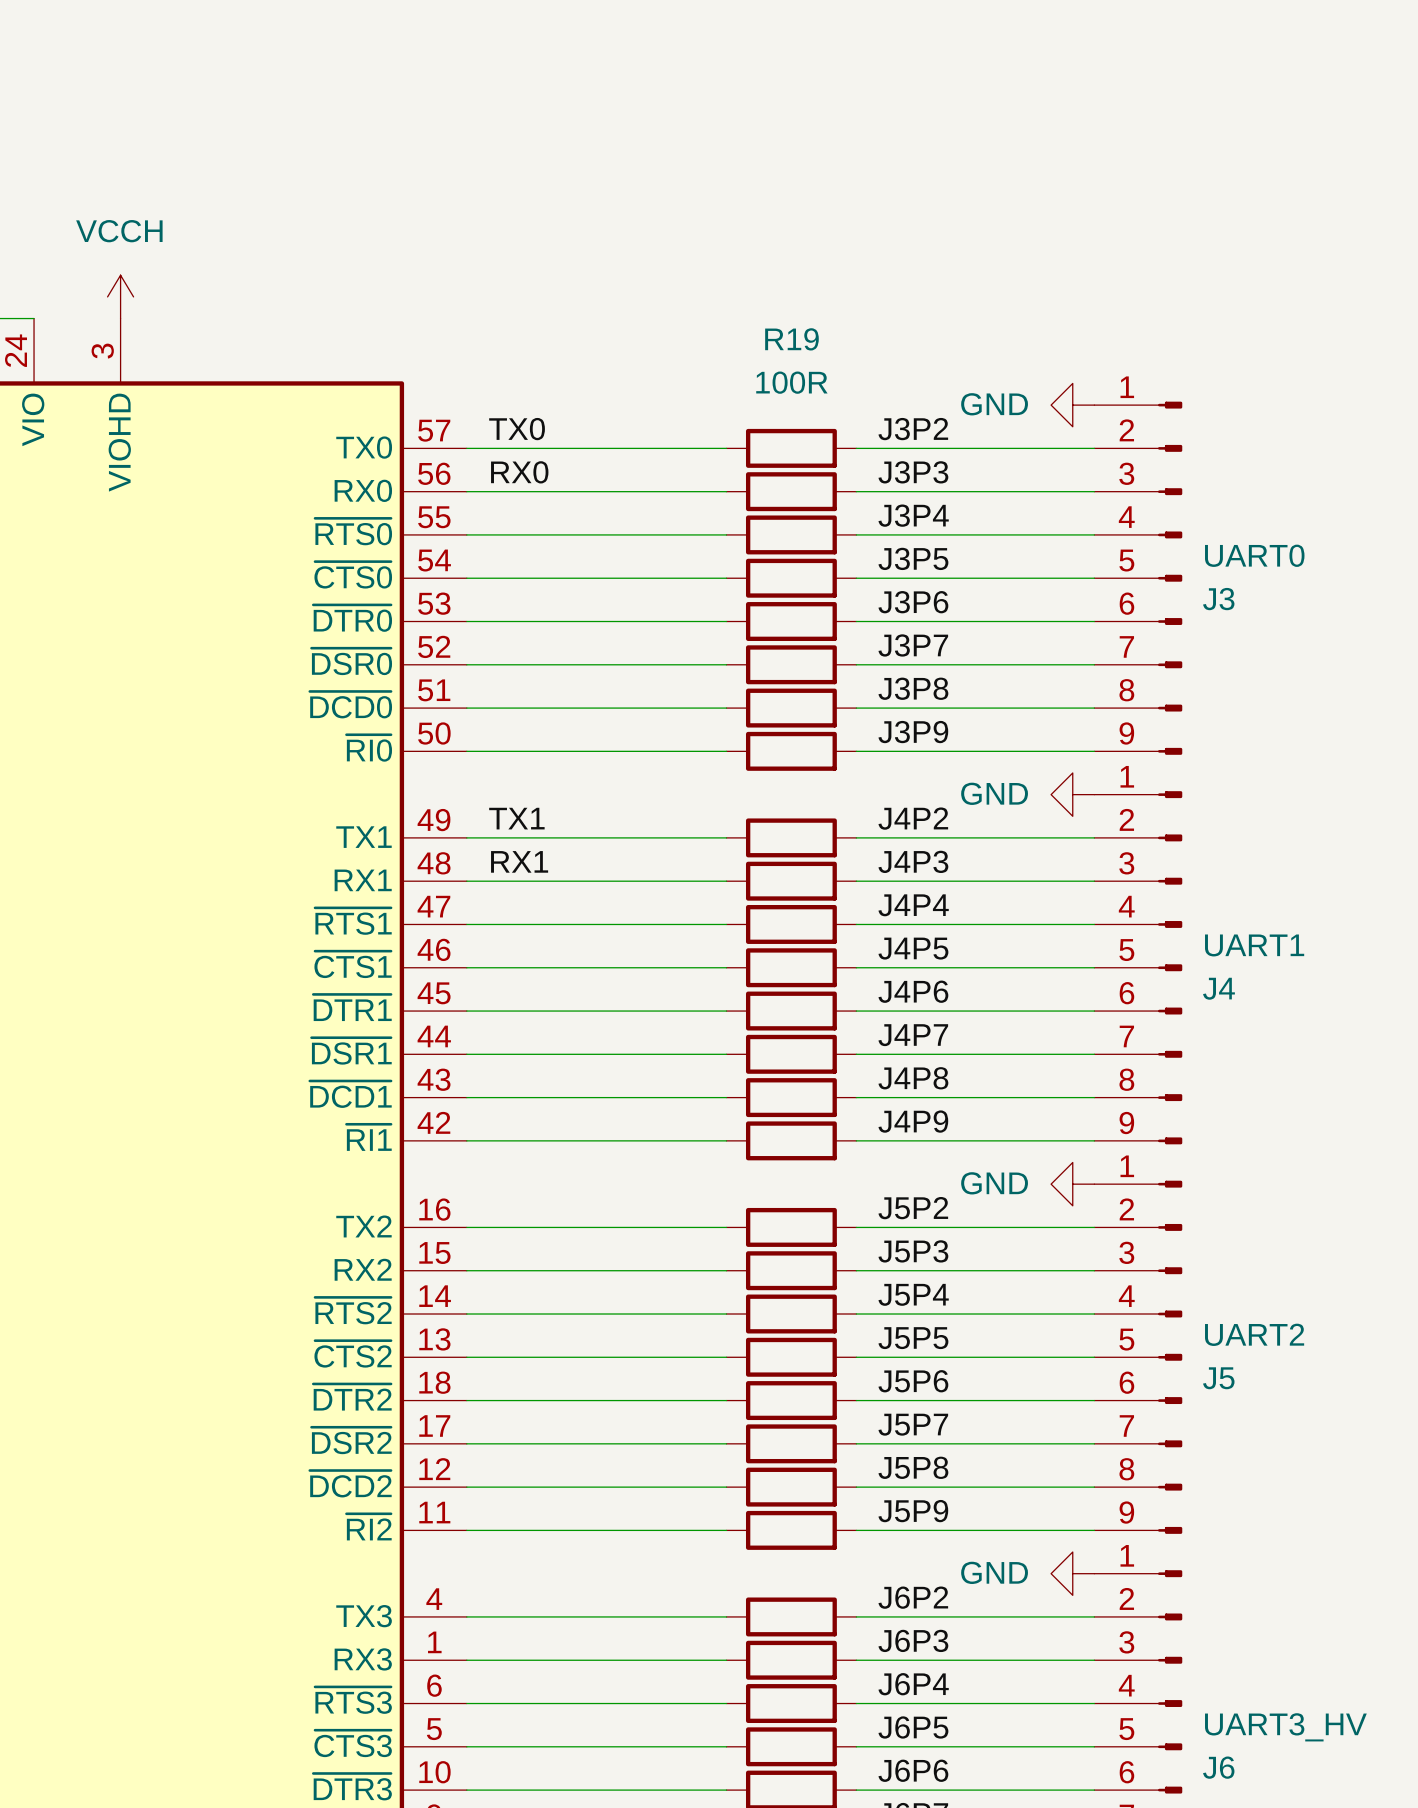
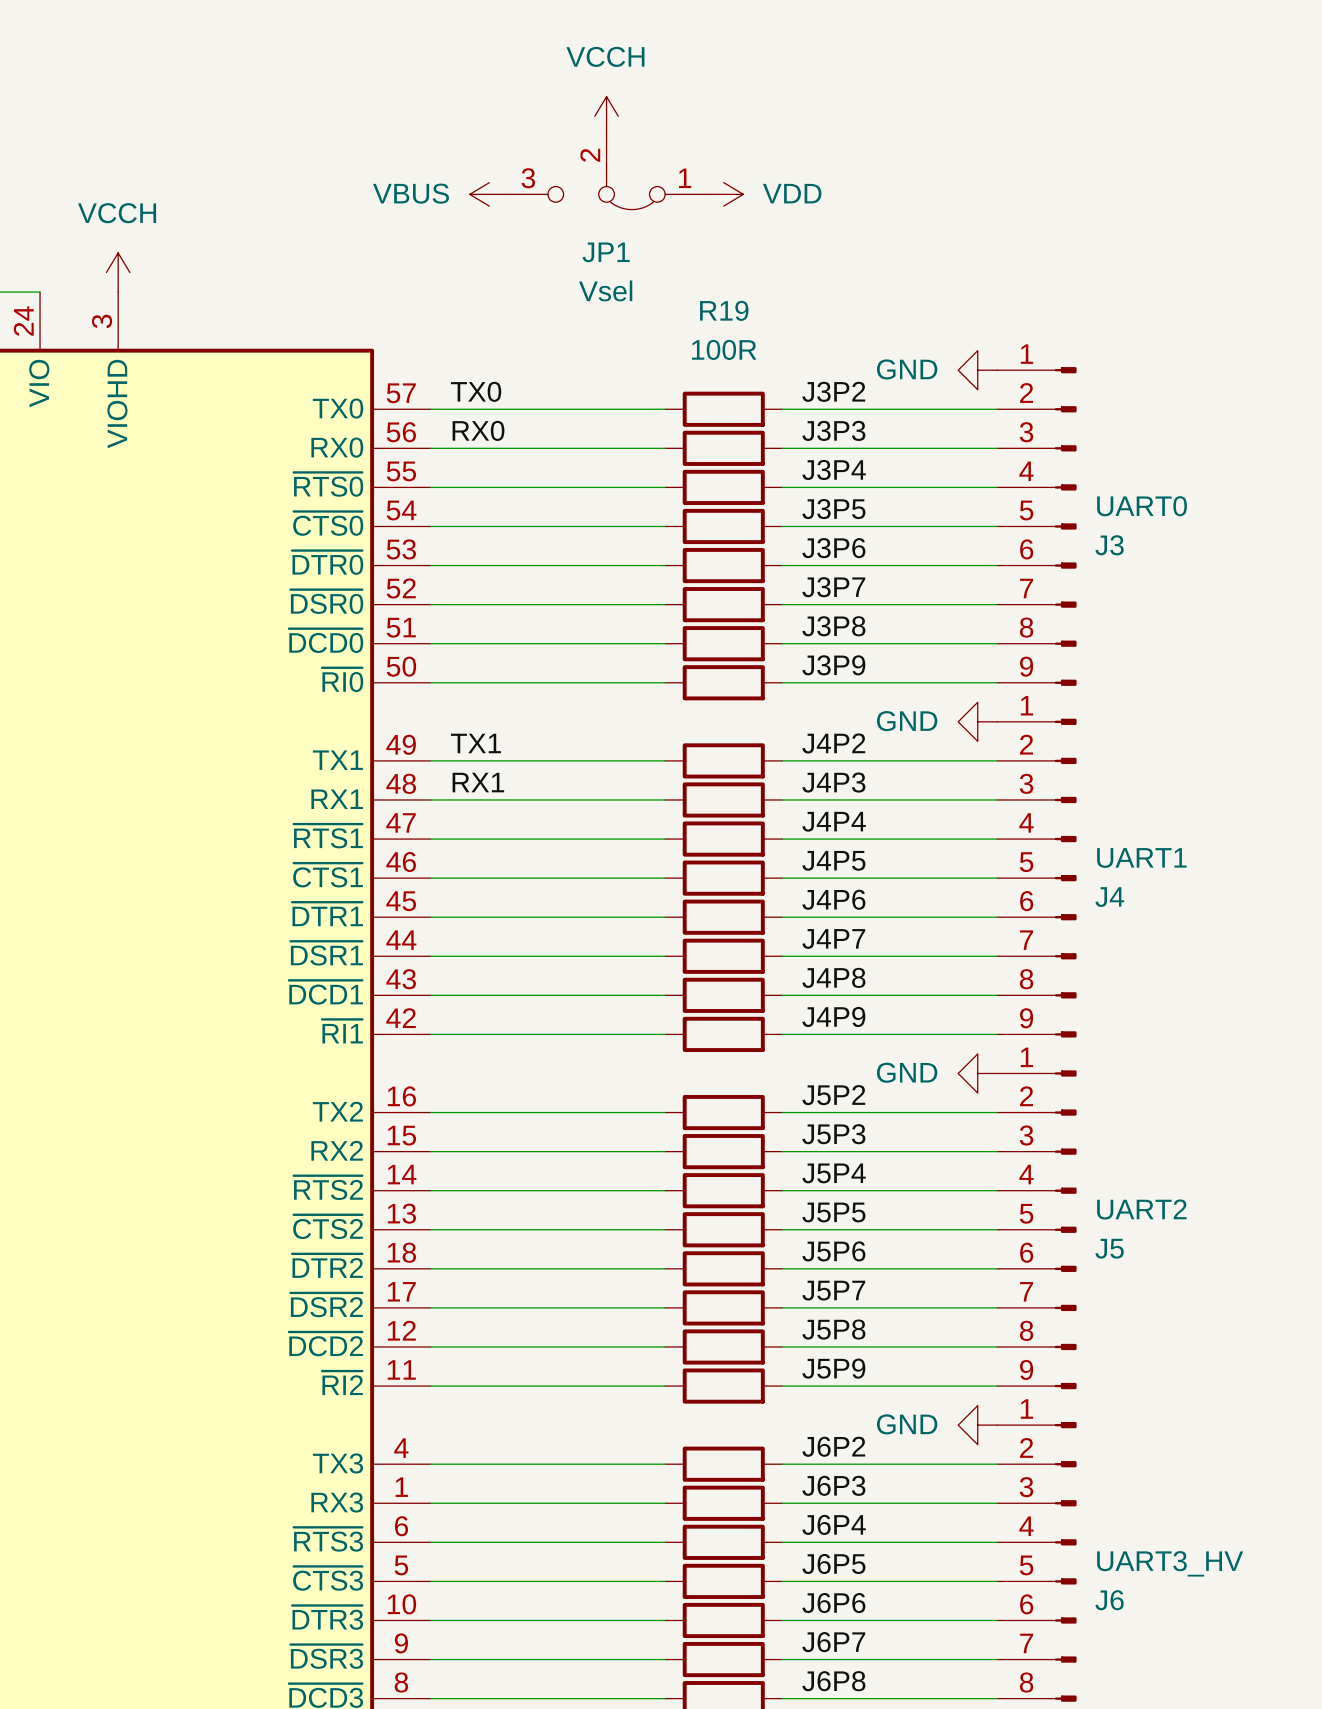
power symbol: none -> VCCH (606, 116)
JP1: none -> Vsel (606, 172)
power symbol: none -> VBUS (489, 194)
power symbol: none -> VDD (723, 194)

